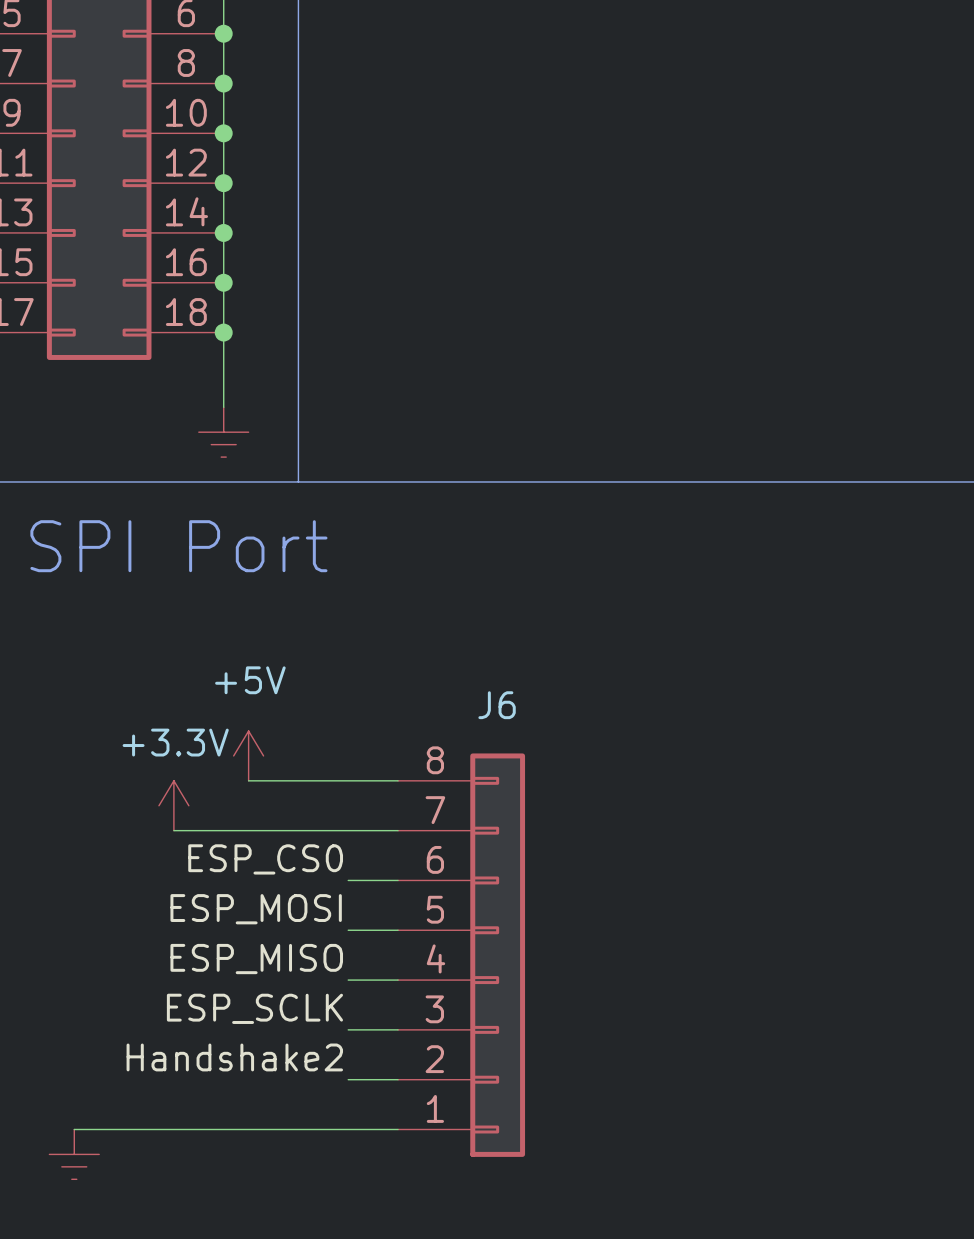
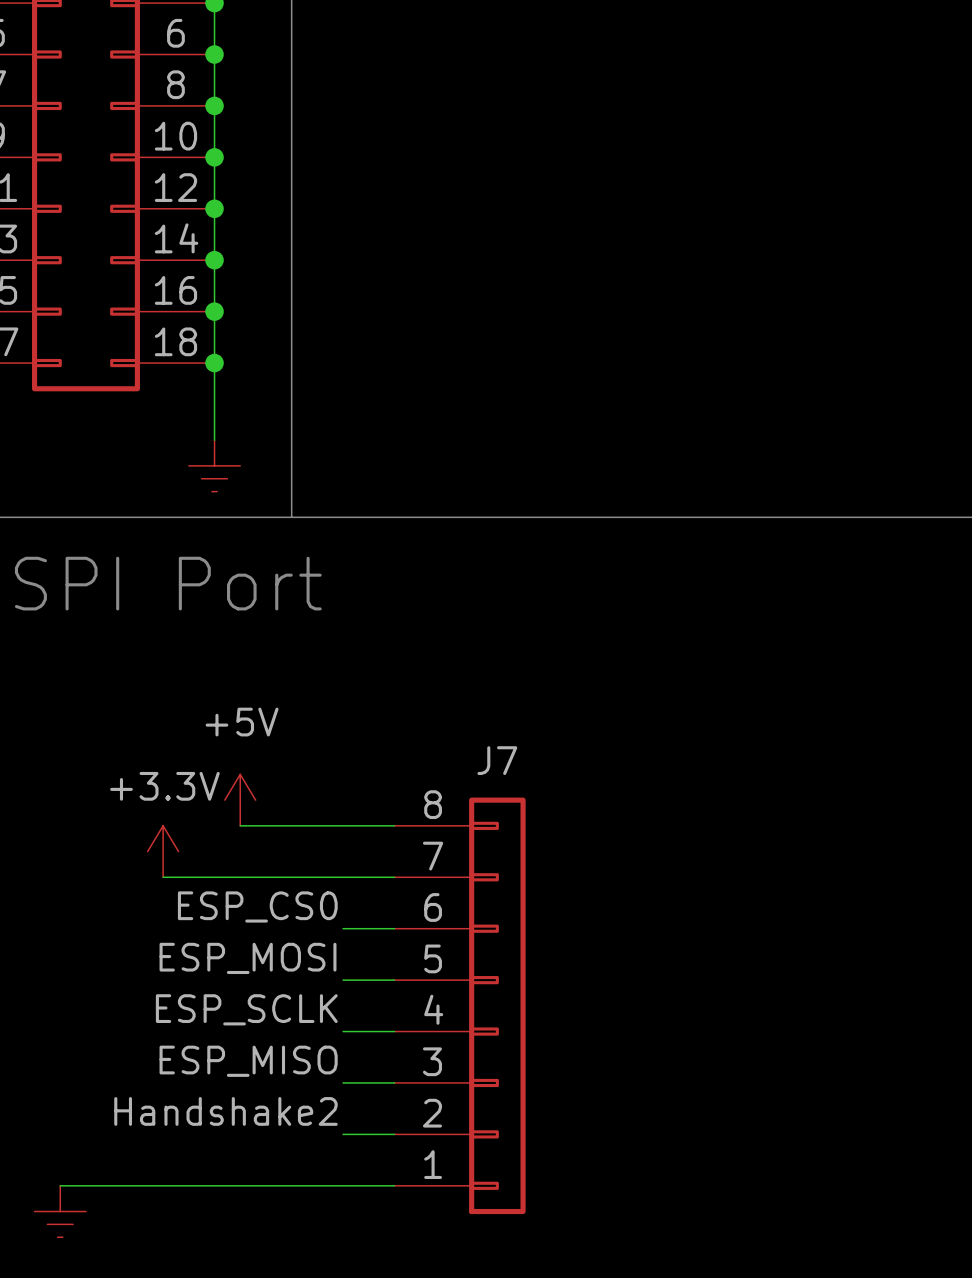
J6 name: J6 (497, 705) -> J7 (497, 760)
label: ESP_MISO (256, 959) -> ESP_SCLK (246, 1009)
label: ESP_SCLK (254, 1008) -> ESP_MISO (248, 1061)

